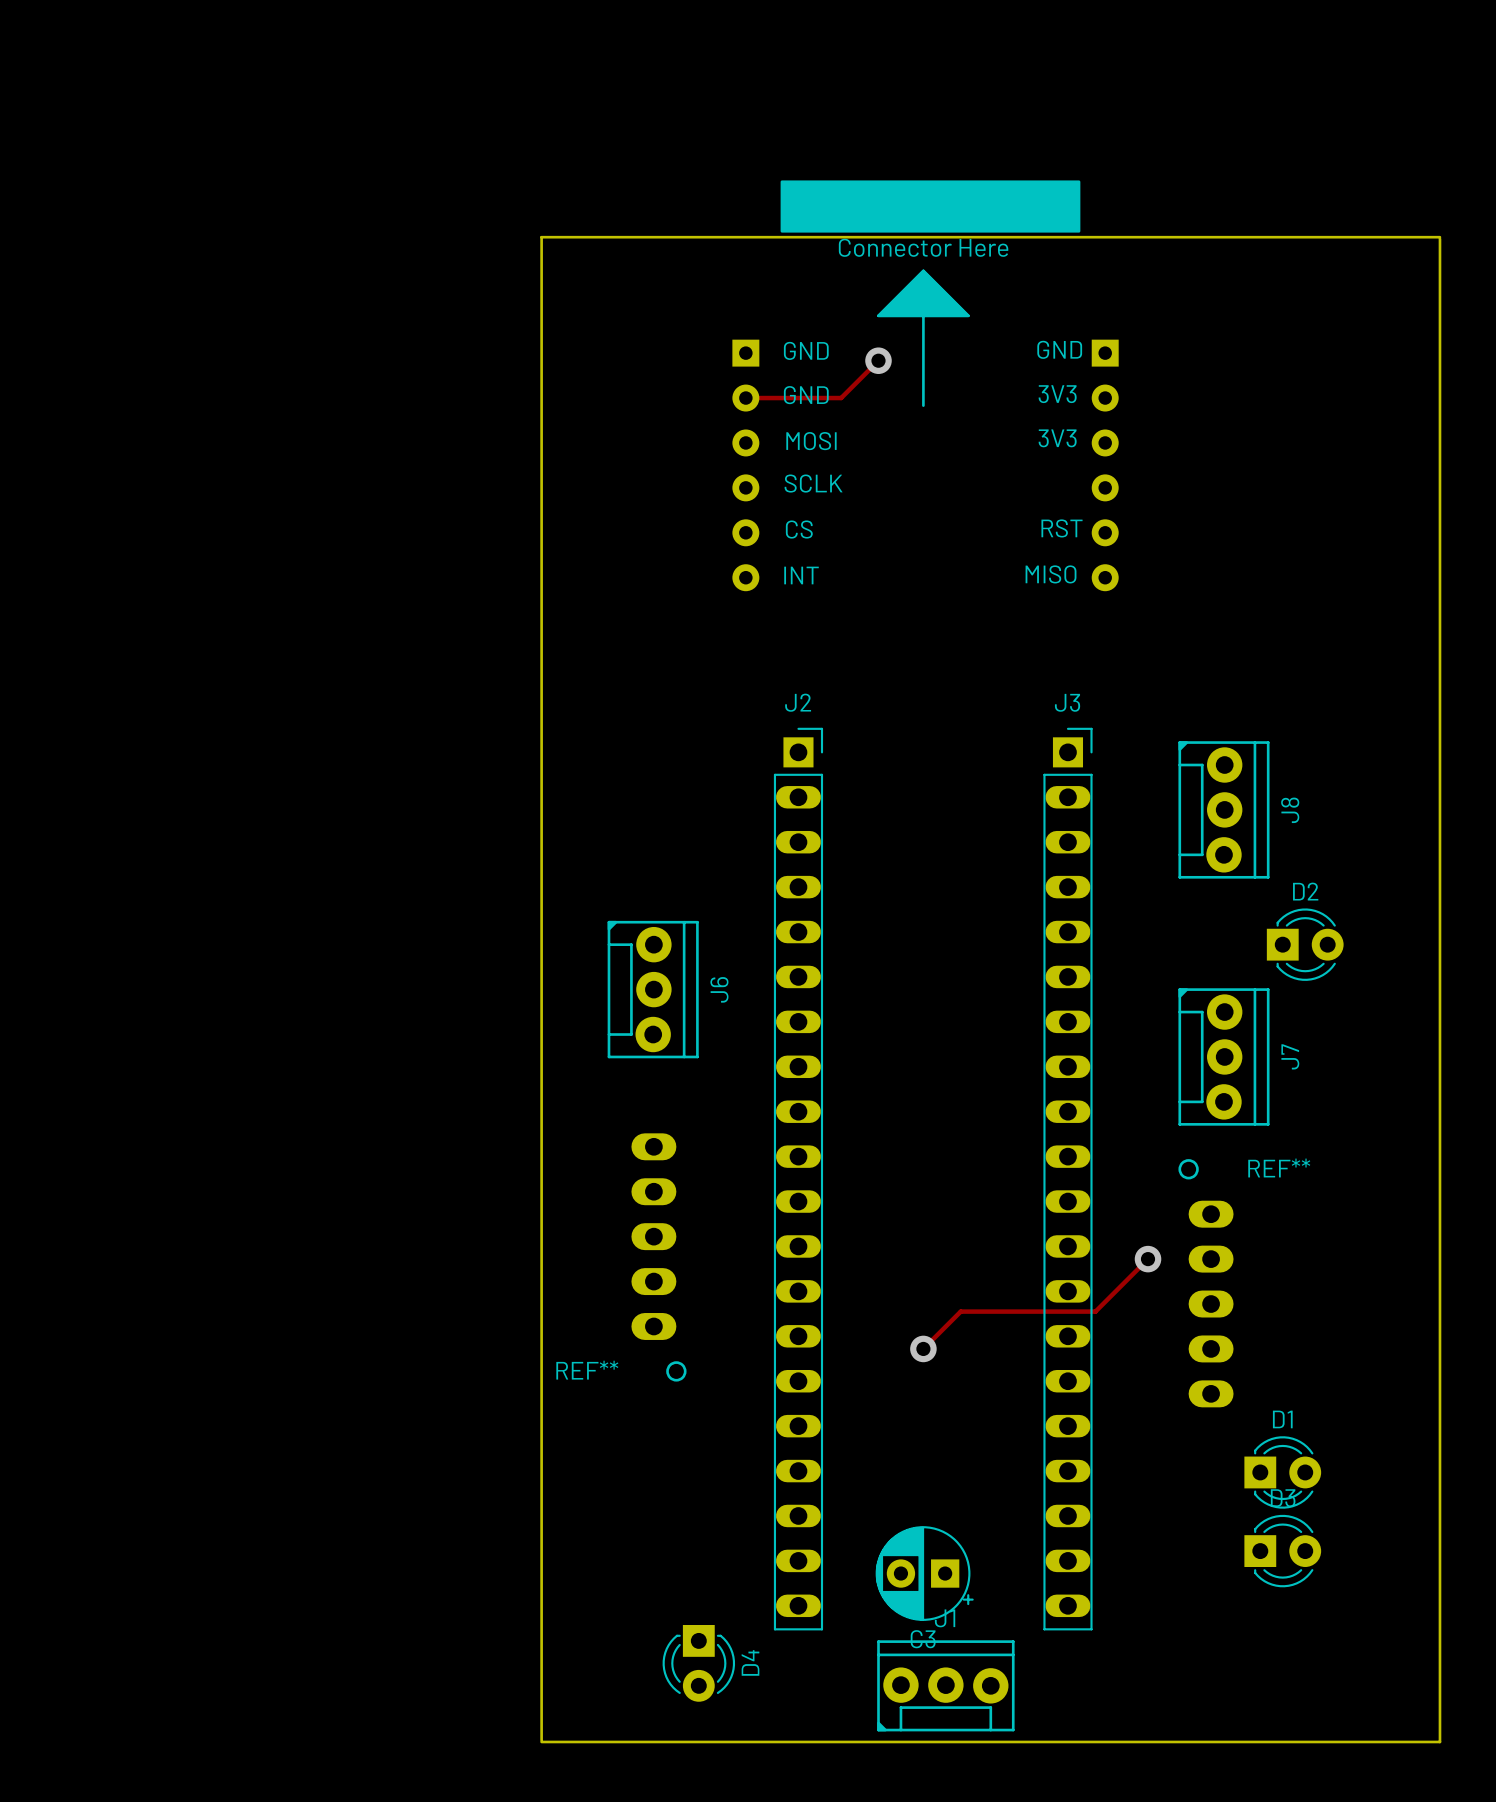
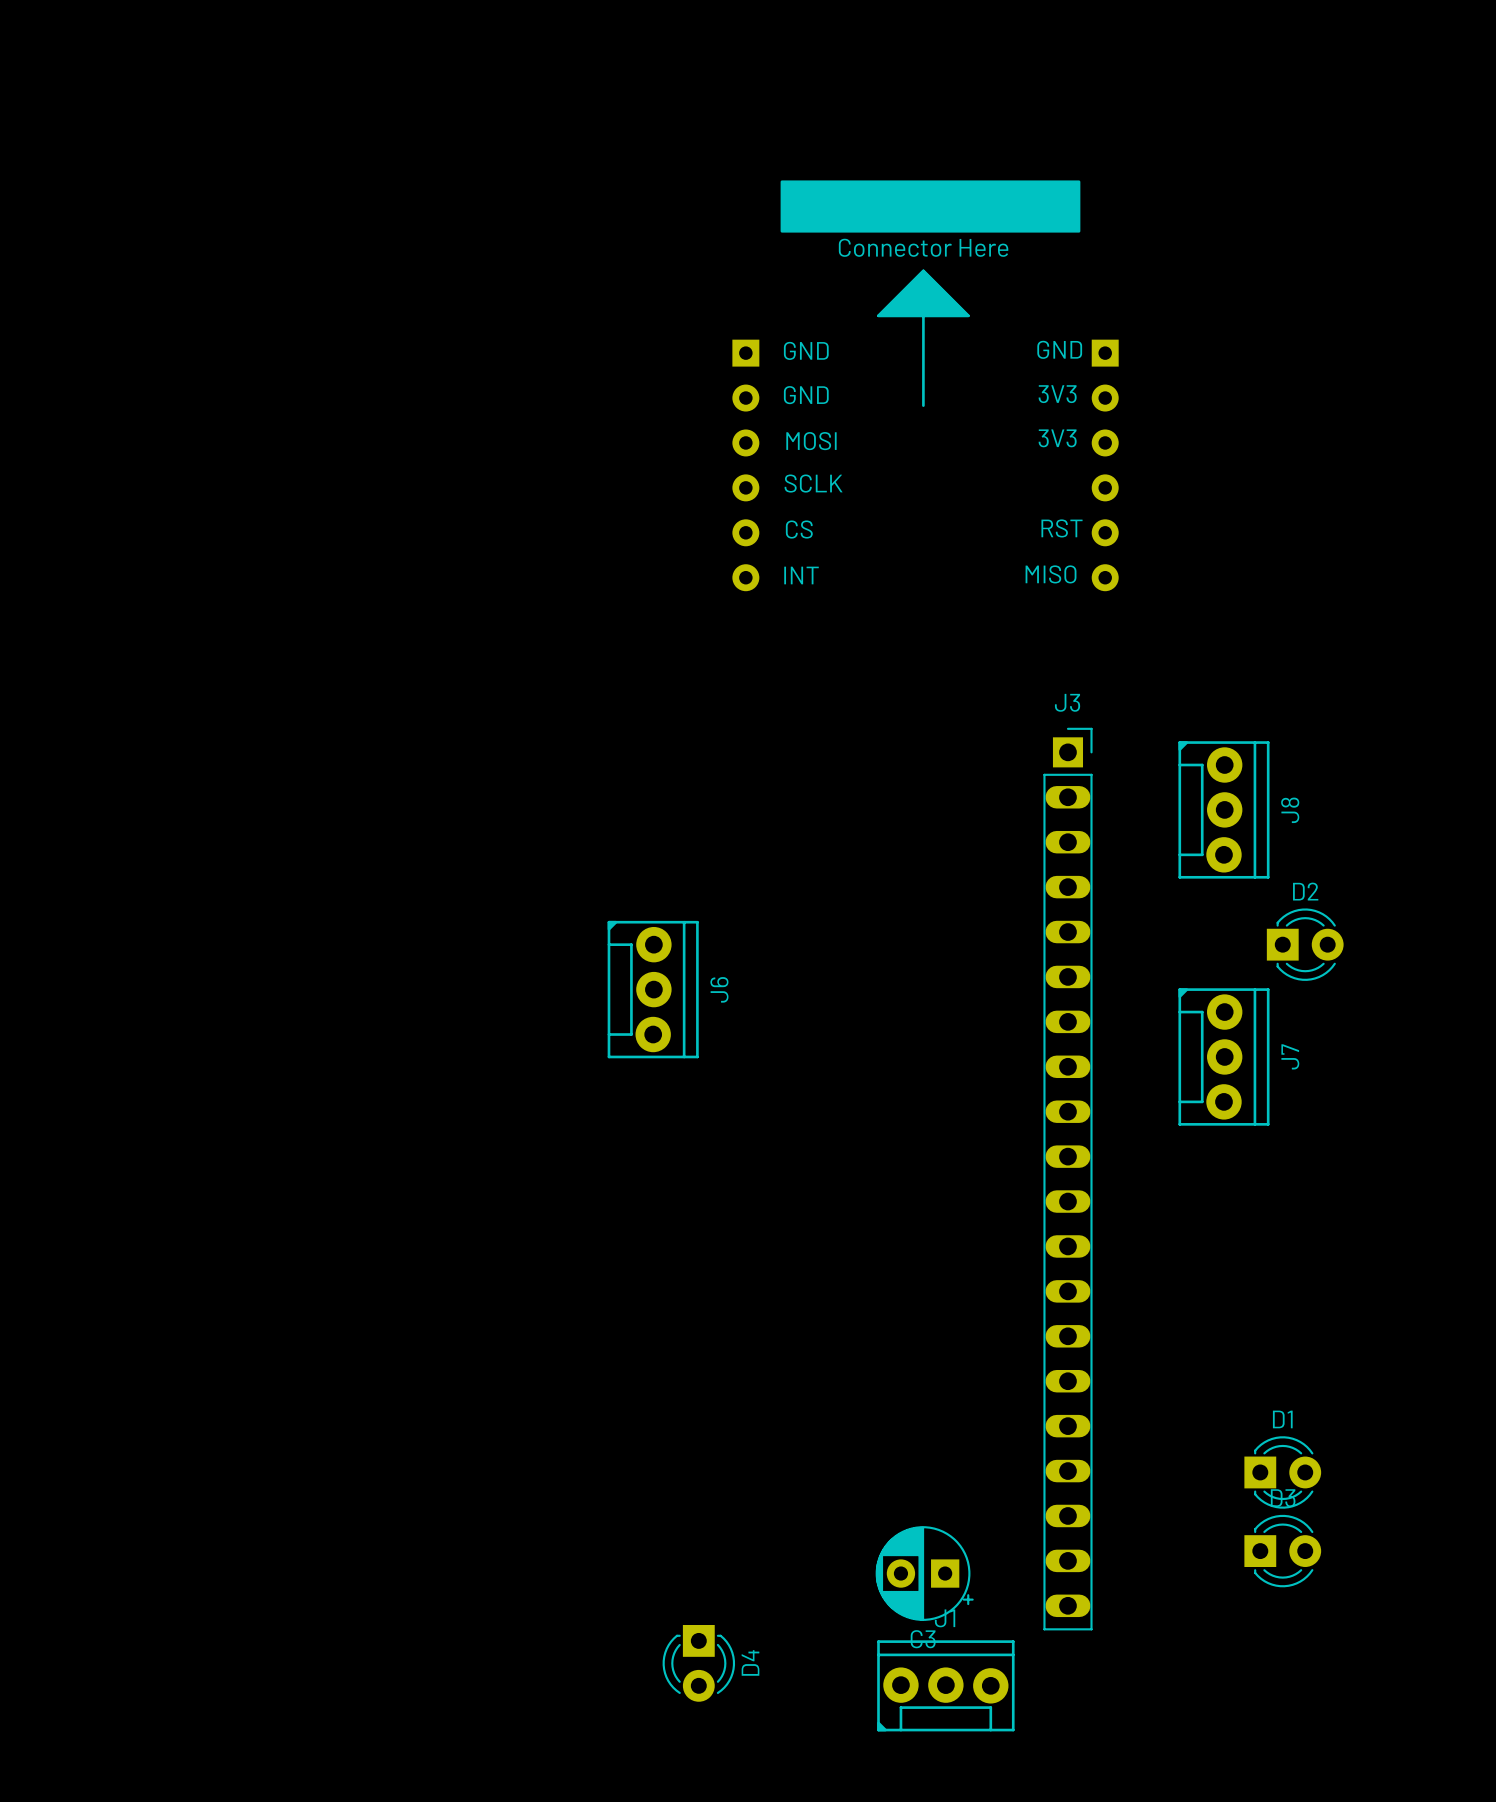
board edge: (1439, 237) (541, 237) (541, 1740) -> none
board edge: (1439, 238) (1439, 1741) (541, 1741) -> none
track: (878, 360) (841, 398) (745, 398) -> none
via: (878, 360) -> none
J2: (798, 1179) -> none
part: (658, 1257) -> none
track: (1148, 1259) (1095, 1311) (960, 1311) (923, 1348) -> none
via: (1148, 1259) -> none
part: (1205, 1283) -> none
via: (923, 1348) -> none

